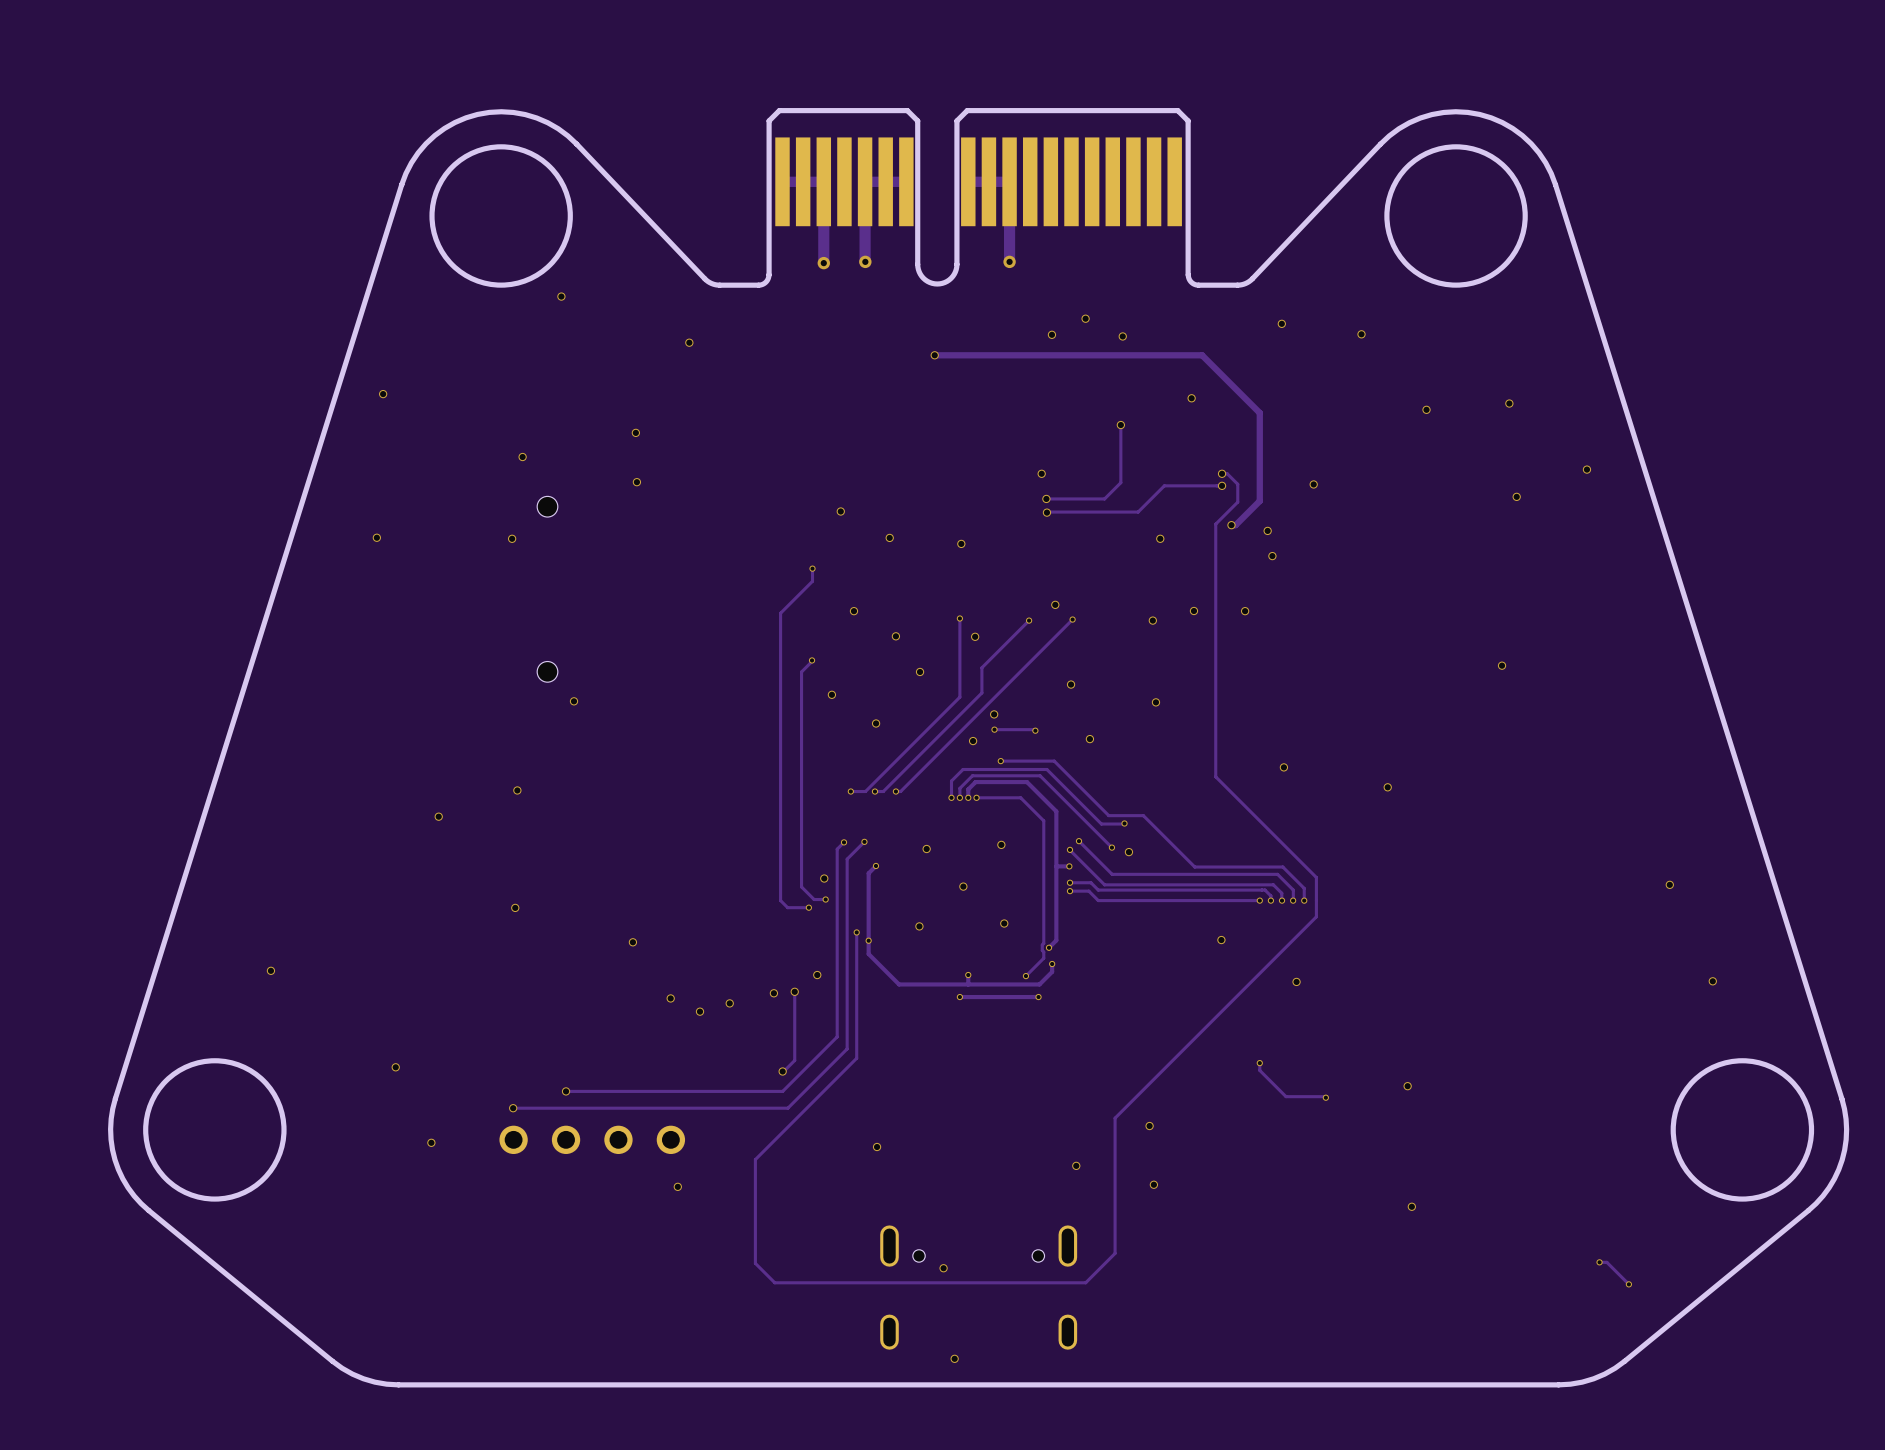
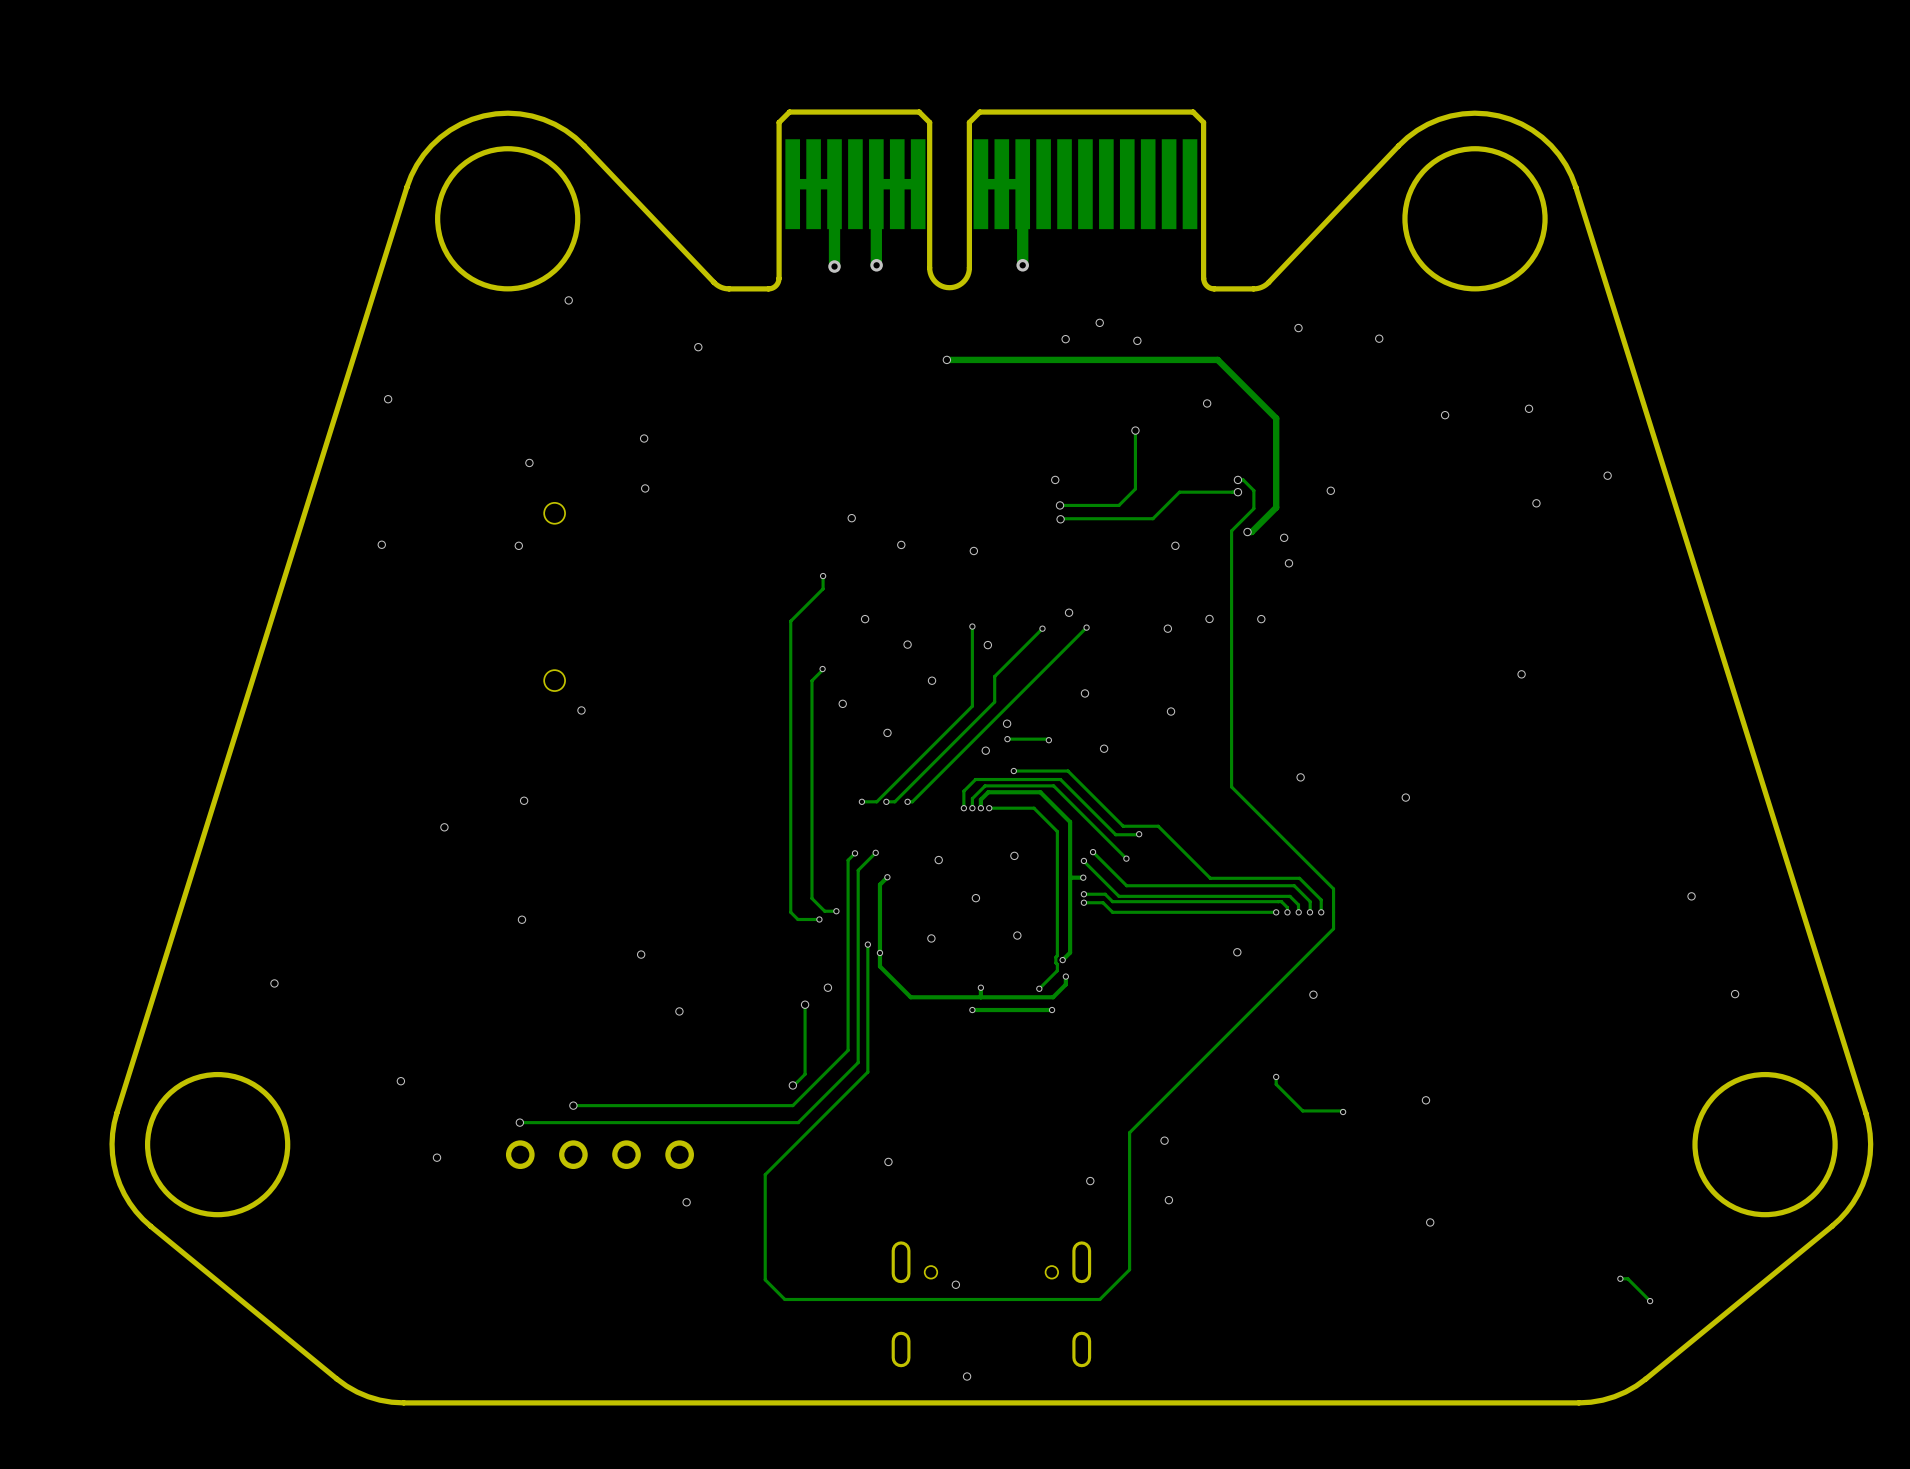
via: (1128, 852) -> none
via: (824, 878) -> none
via: (773, 993) -> none
via: (729, 1003) -> none
via: (700, 1011) -> none

